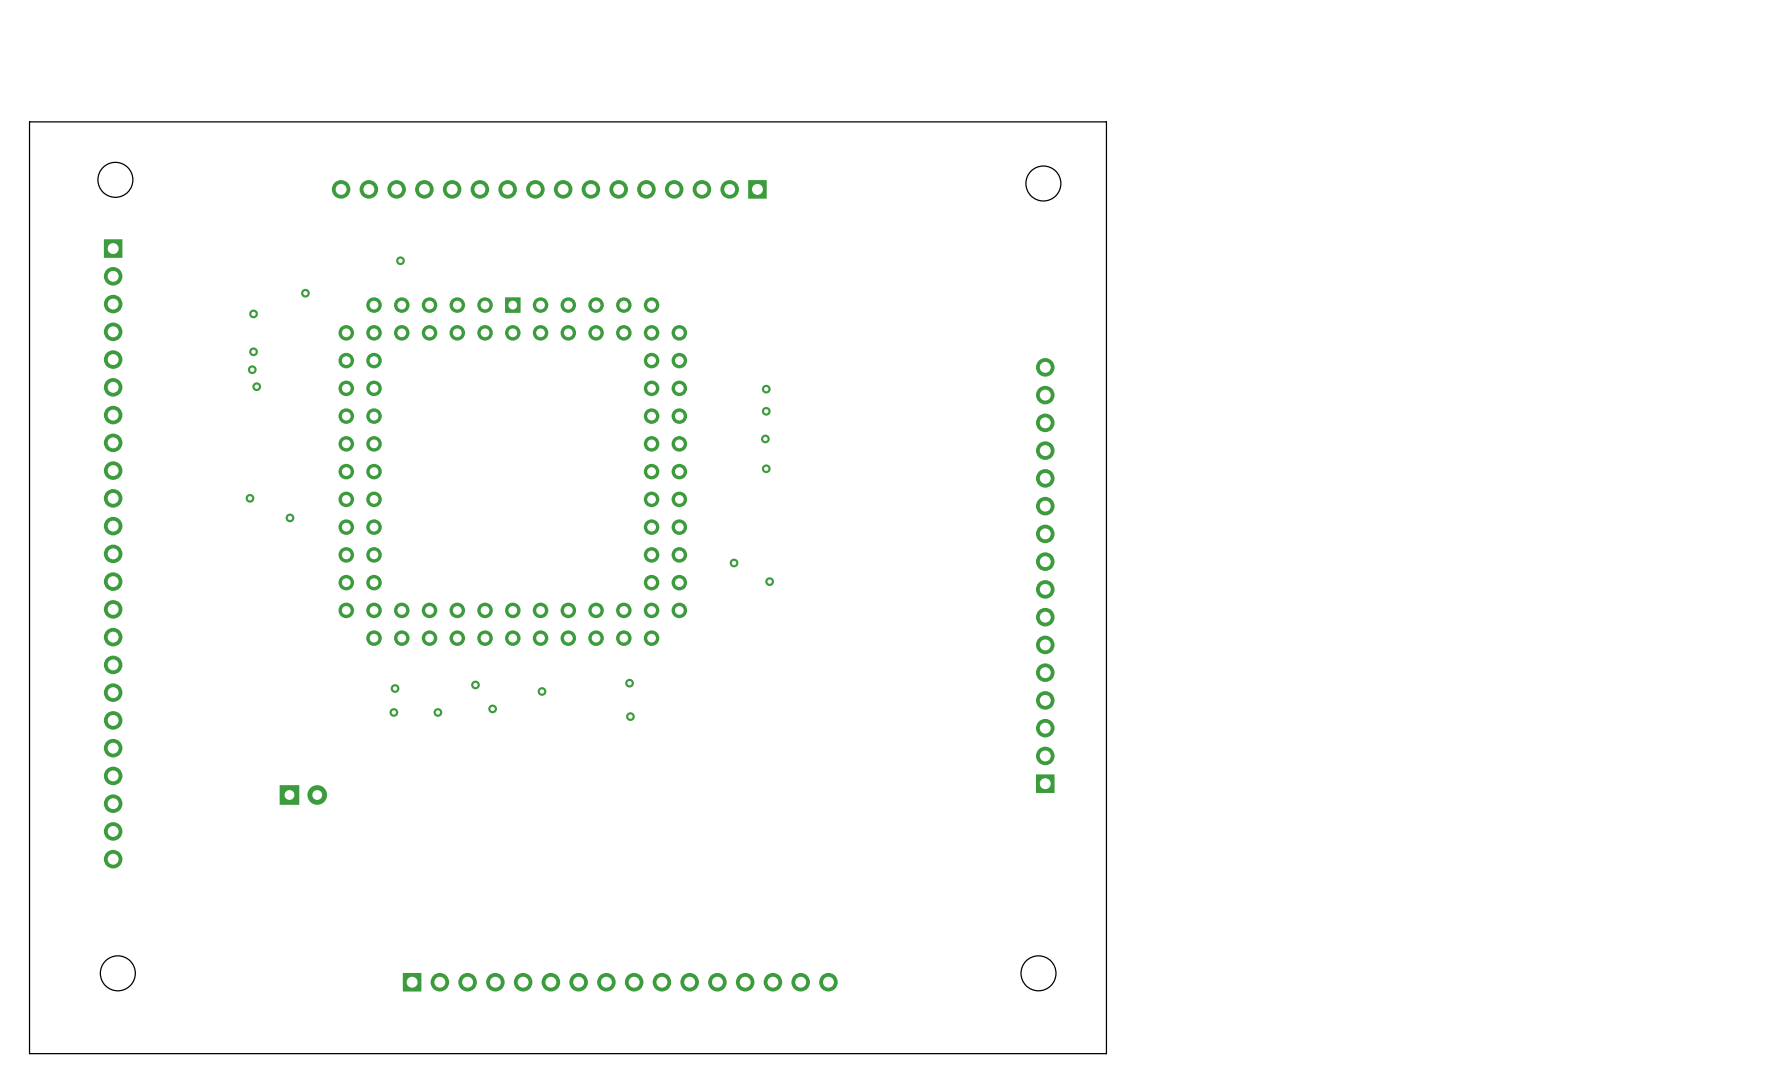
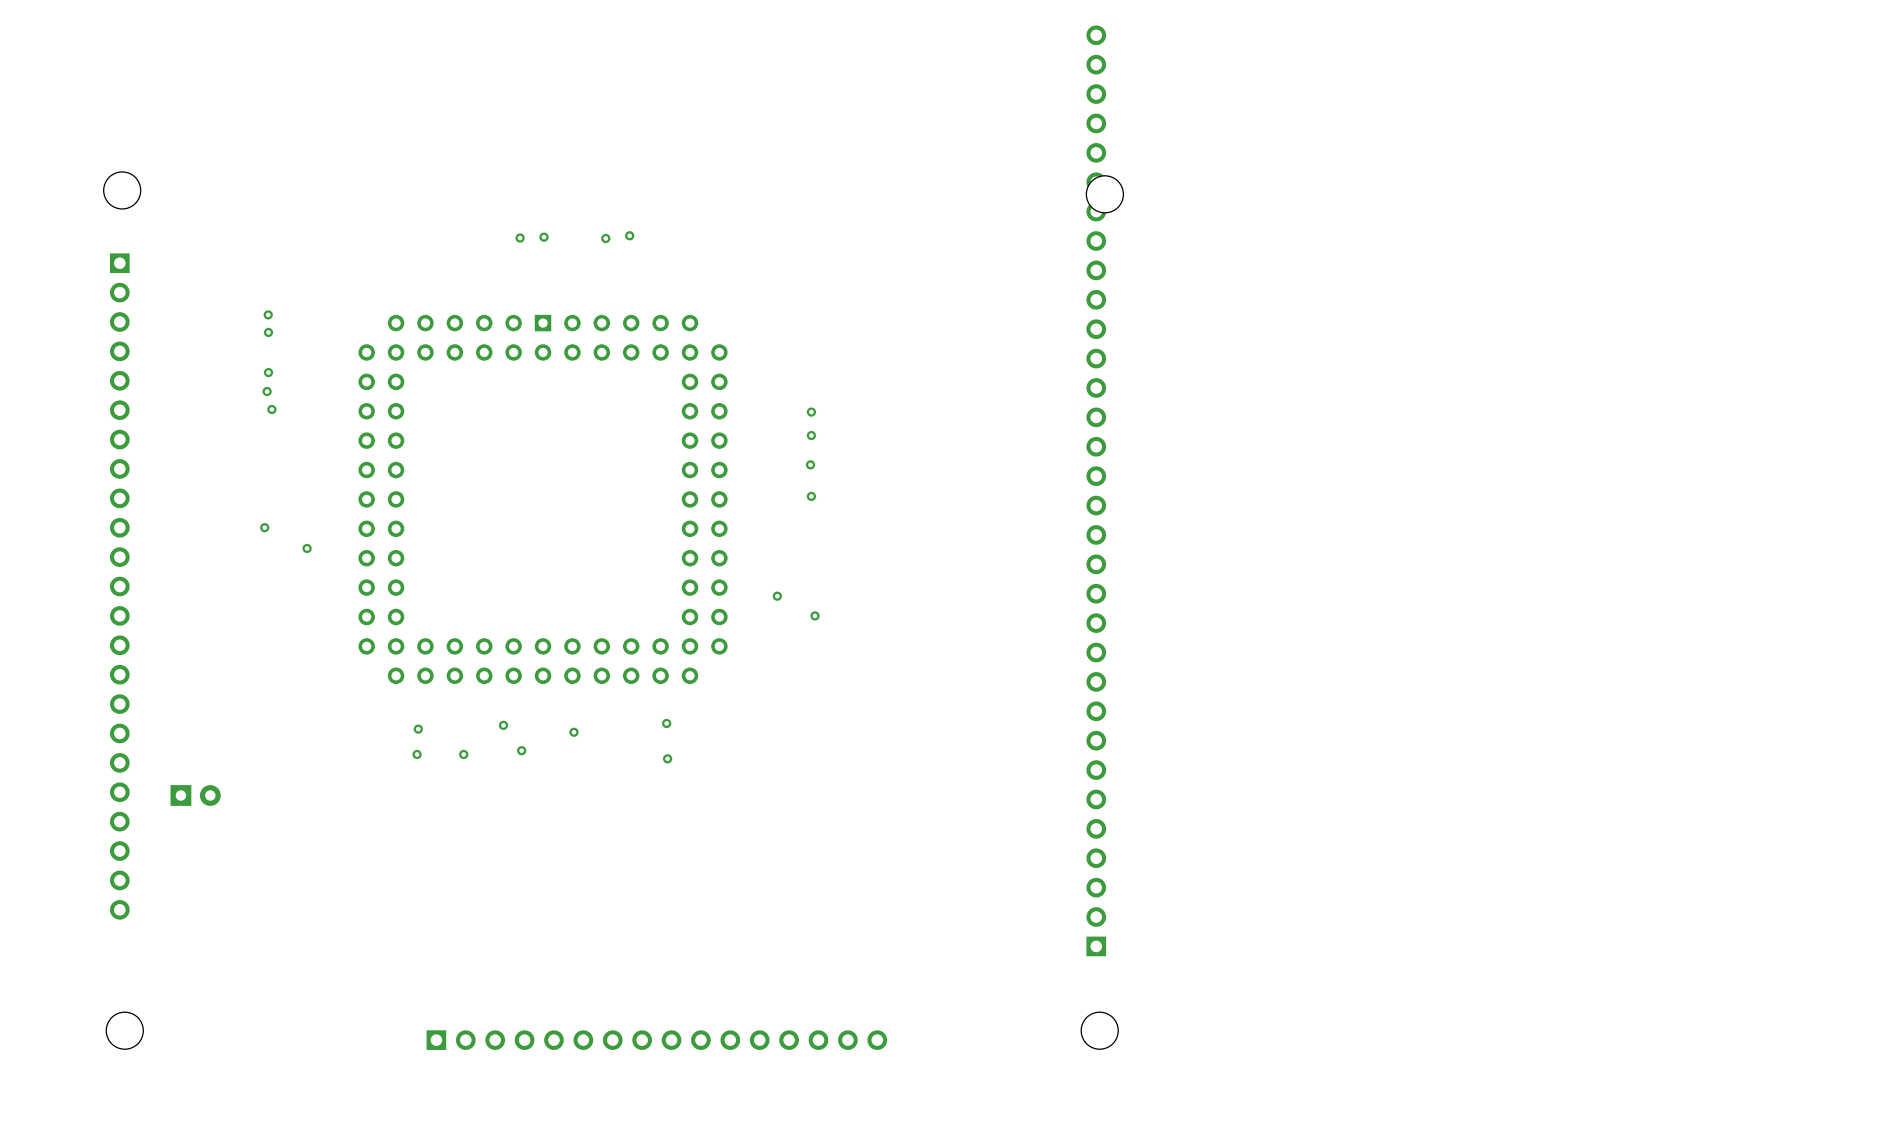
board edge: (1106, 121) (29, 121) (29, 1053) (1106, 1053) (1106, 121) -> none
part: (549, 189) -> none
via: none -> (629, 235)
via: none -> (544, 237)
via: none -> (520, 238)
via: none -> (605, 238)
via: (400, 260) -> none
via position: (305, 293) -> (268, 314)
part: none -> (1096, 490)
part: (1045, 575) -> none
part position: (303, 794) -> (195, 795)

